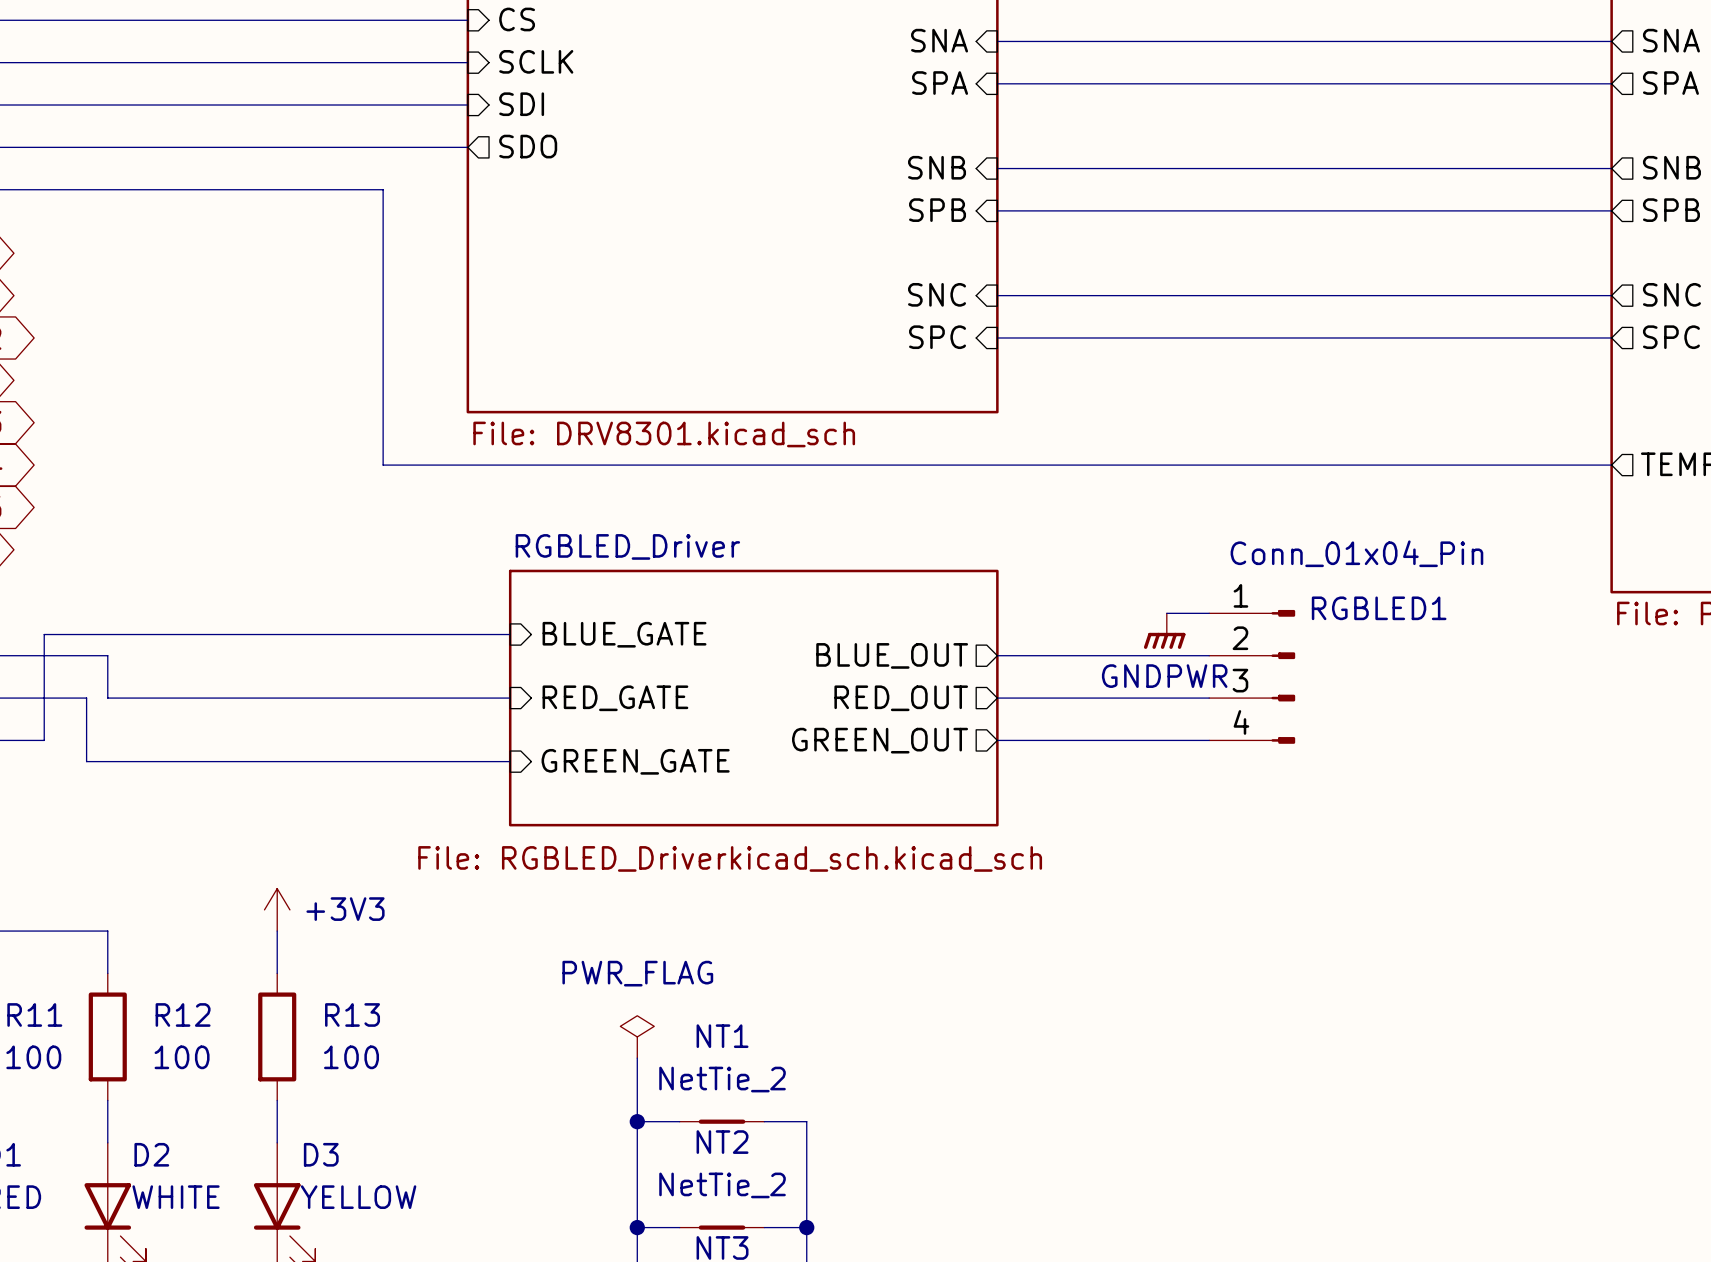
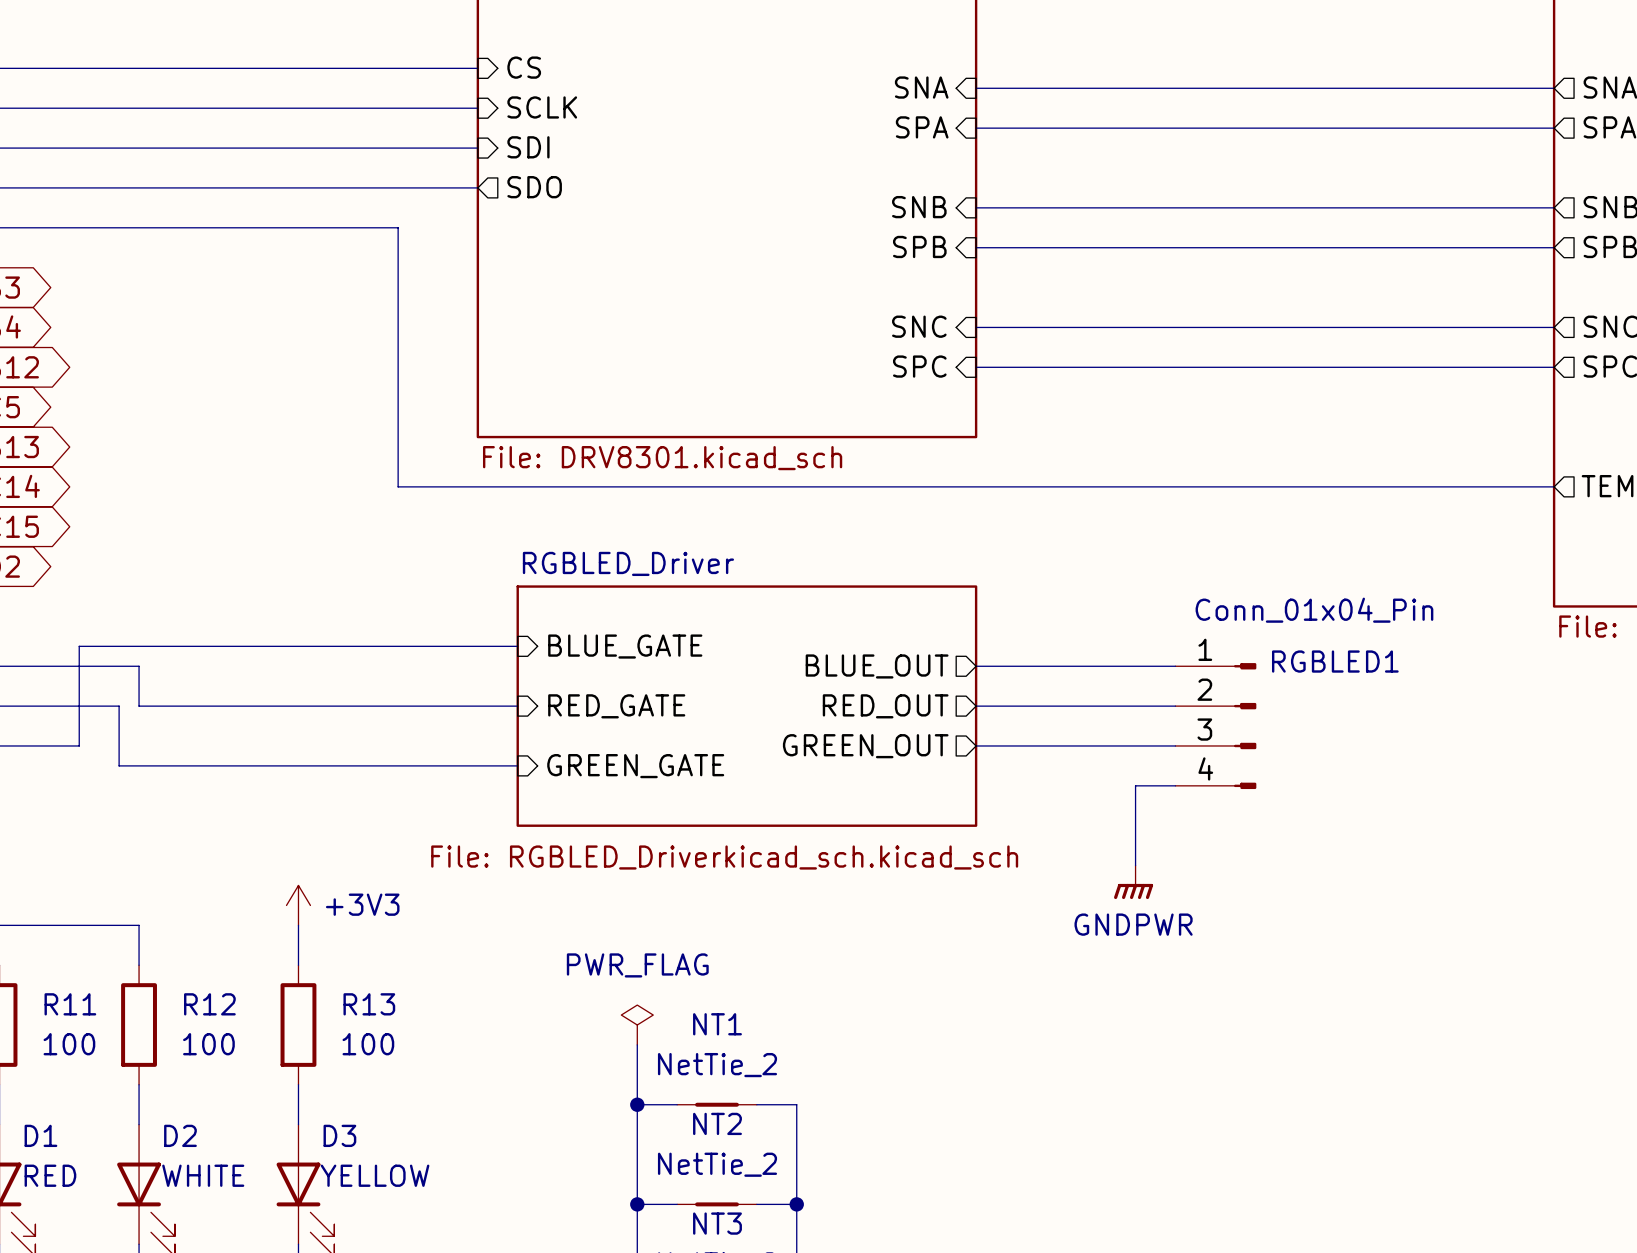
wire: (1166, 613) (1209, 613) -> none
power symbol position: GNDPWR (1164, 631) -> GNDPWR (1133, 882)
RGBLED1 position: (1252, 676) -> (1215, 726)
wire: none -> (1175, 785) (1135, 785) (1135, 865)

